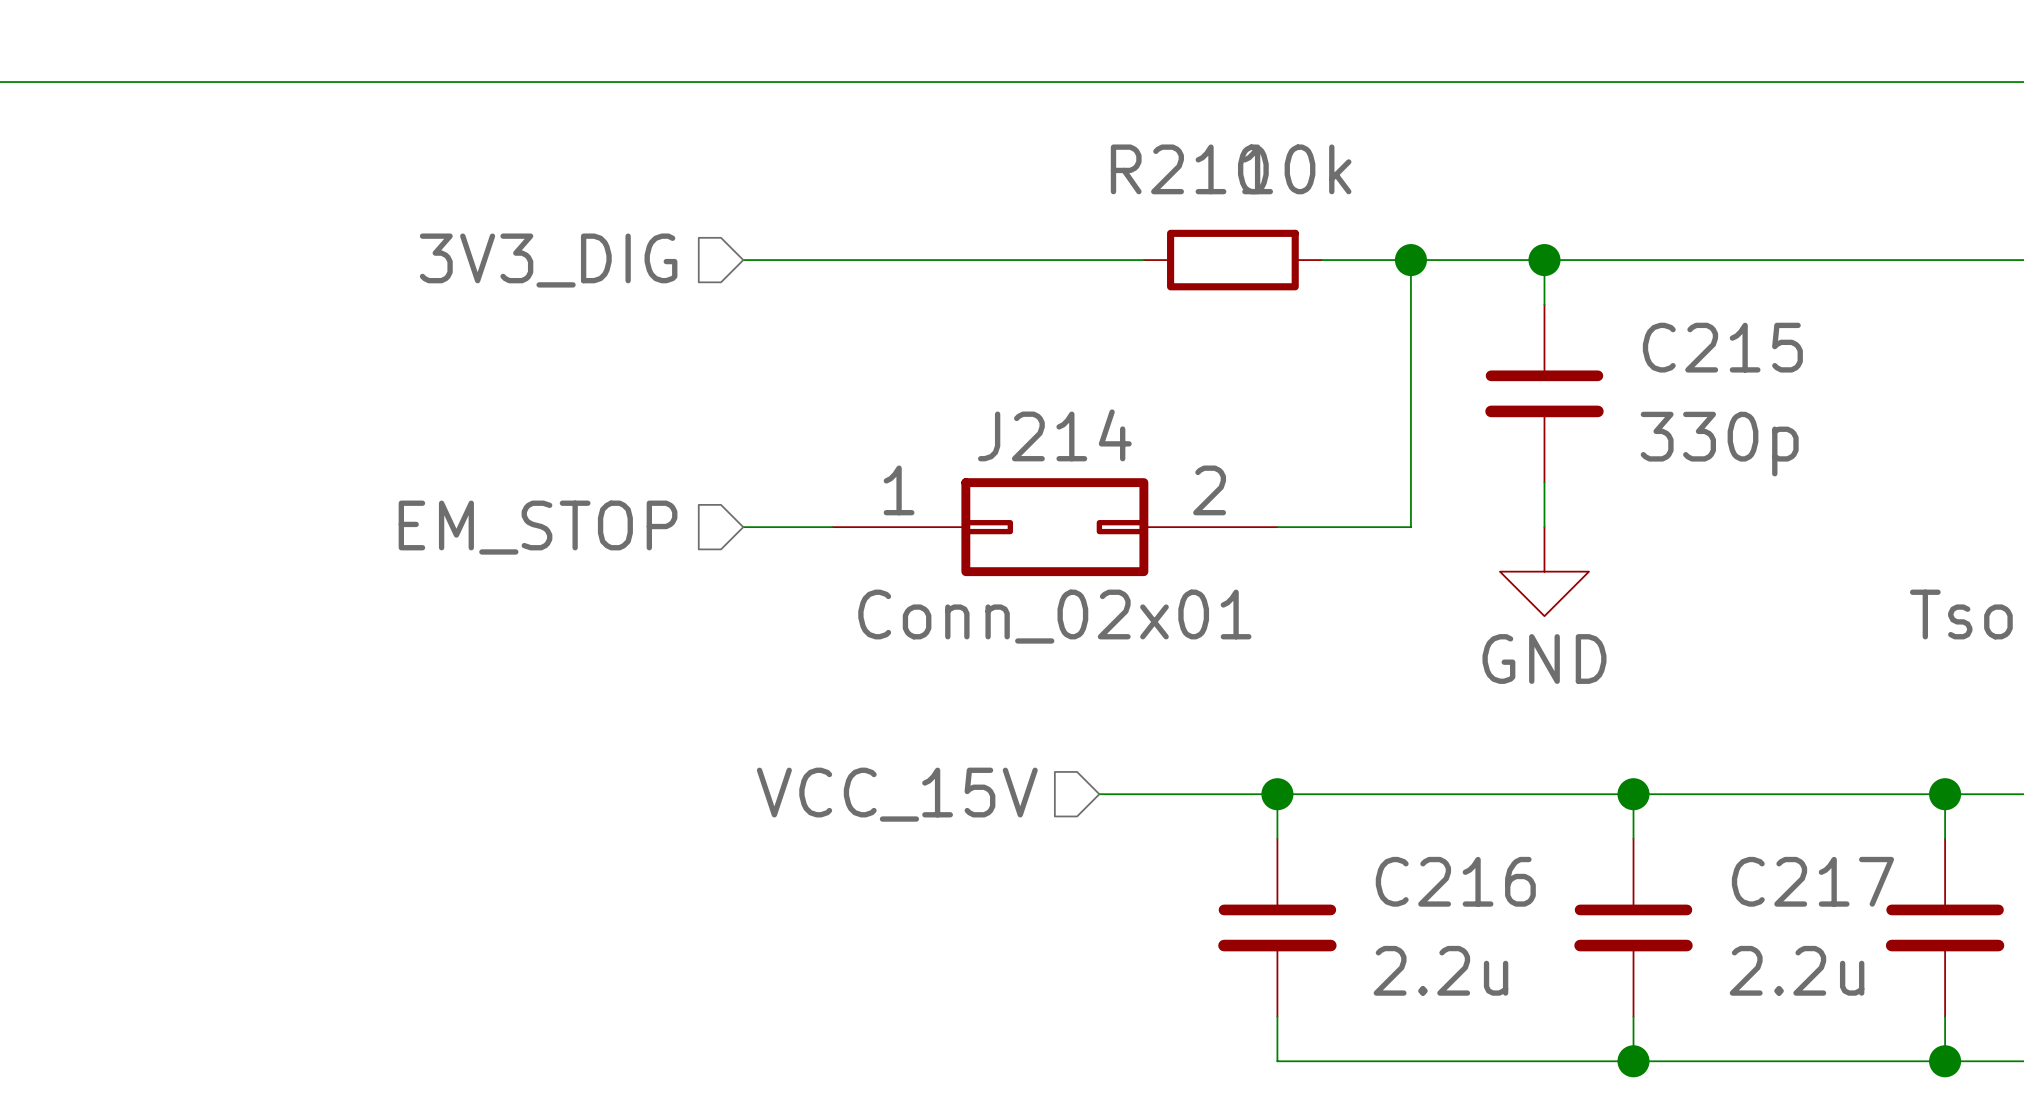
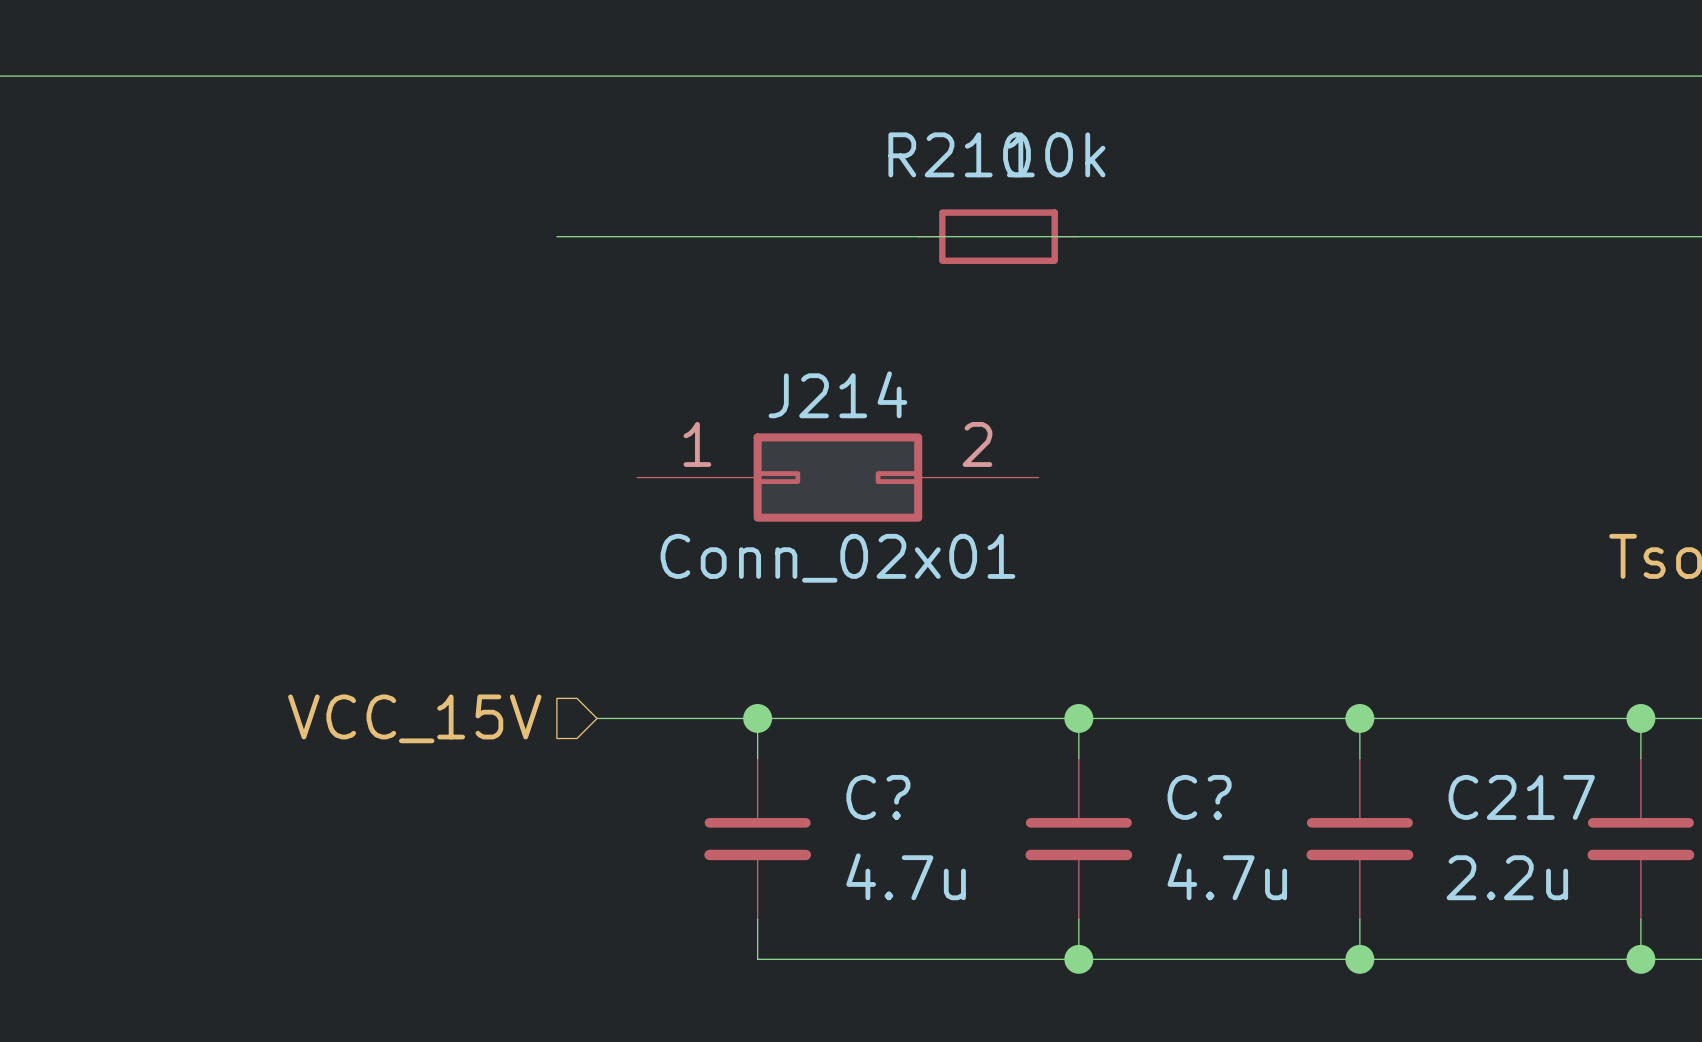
hierarchical label: 3V3_DIG (548, 260) -> none
wire: none -> (918, 236) (1078, 236)
wire: (1410, 260) (1410, 527) (1277, 527) -> none
junction: (1410, 260) -> none
wire: (1544, 260) (1544, 304) -> (757, 718) (757, 758)
junction: (1544, 260) -> none
C215: 330p (1544, 393) -> none
wire: (1544, 482) (1544, 527) -> (1078, 919) (1078, 959)
hierarchical label: EM_STOP (538, 527) -> none
wire: (743, 527) (832, 527) -> none
power symbol: GND (1544, 571) -> none
wire: none -> (597, 718) (878, 718)
hierarchical label position: VCC_15V (897, 794) -> VCC_15V (414, 718)
junction: none -> (757, 718)
wire: (1277, 794) (1277, 838) -> (1078, 718) (1078, 758)
junction position: (1277, 794) -> (1078, 718)
C?: none -> 4.7u (757, 838)
C216: 2.2u (1277, 927) -> none
C?: none -> 4.7u (1078, 838)
wire: (1277, 1016) (1277, 1061) -> (757, 919) (757, 959) (1038, 959)
junction: none -> (1078, 959)

